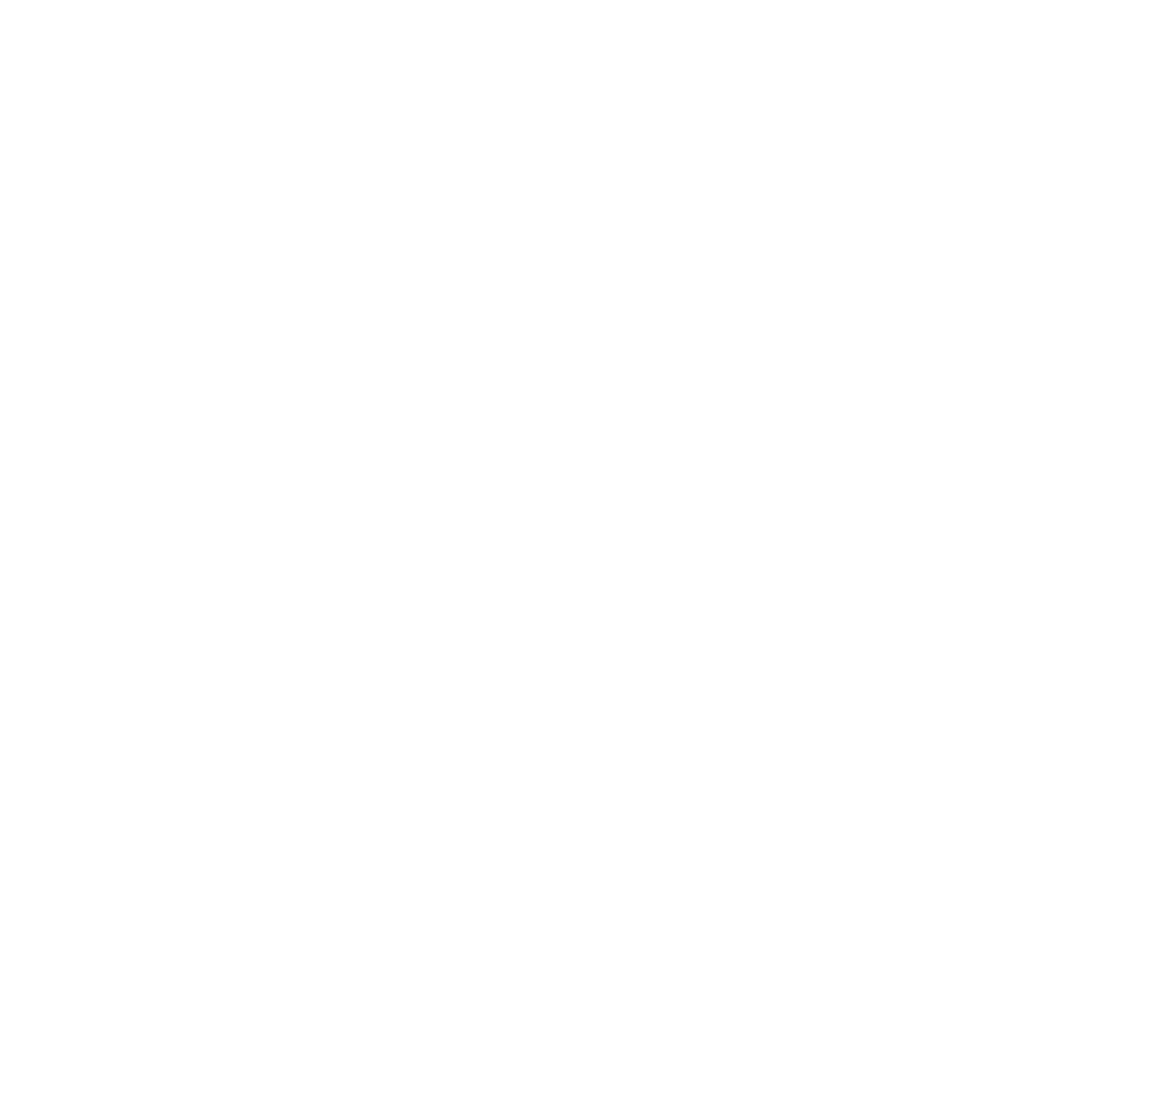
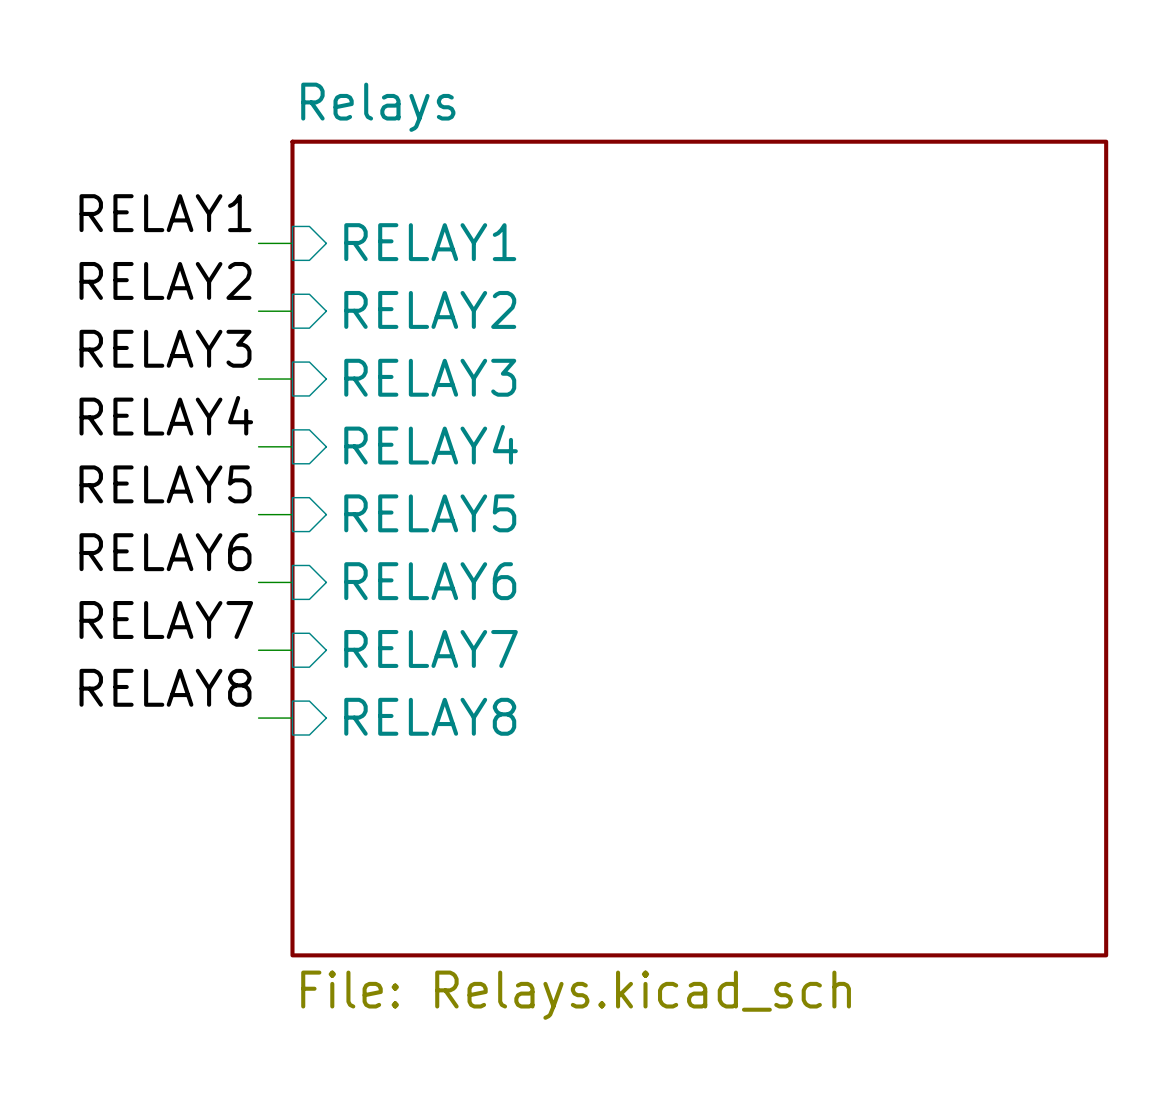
label: none -> RELAY1 (165, 213)
sheet pin: none -> RELAY1 (430, 242)
wire: none -> (258, 243) (292, 243)
label: none -> RELAY2 (165, 280)
sheet pin: none -> RELAY2 (430, 309)
wire: none -> (258, 311) (292, 311)
label: none -> RELAY3 (165, 348)
sheet pin: none -> RELAY3 (430, 377)
wire: none -> (258, 379) (292, 379)
label: none -> RELAY4 (166, 415)
sheet pin: none -> RELAY4 (431, 444)
wire: none -> (258, 446) (292, 446)
label: none -> RELAY5 (165, 484)
sheet pin: none -> RELAY5 (430, 513)
wire: none -> (258, 514) (292, 514)
sheet Relays: none -> File: Relays.kicad_sch (699, 548)
label: none -> RELAY6 (165, 552)
sheet pin: none -> RELAY6 (430, 581)
wire: none -> (258, 582) (292, 582)
label: none -> RELAY7 (166, 619)
sheet pin: none -> RELAY7 (431, 648)
wire: none -> (258, 650) (292, 650)
label: none -> RELAY8 (165, 687)
sheet pin: none -> RELAY8 (430, 716)
wire: none -> (258, 718) (292, 718)

